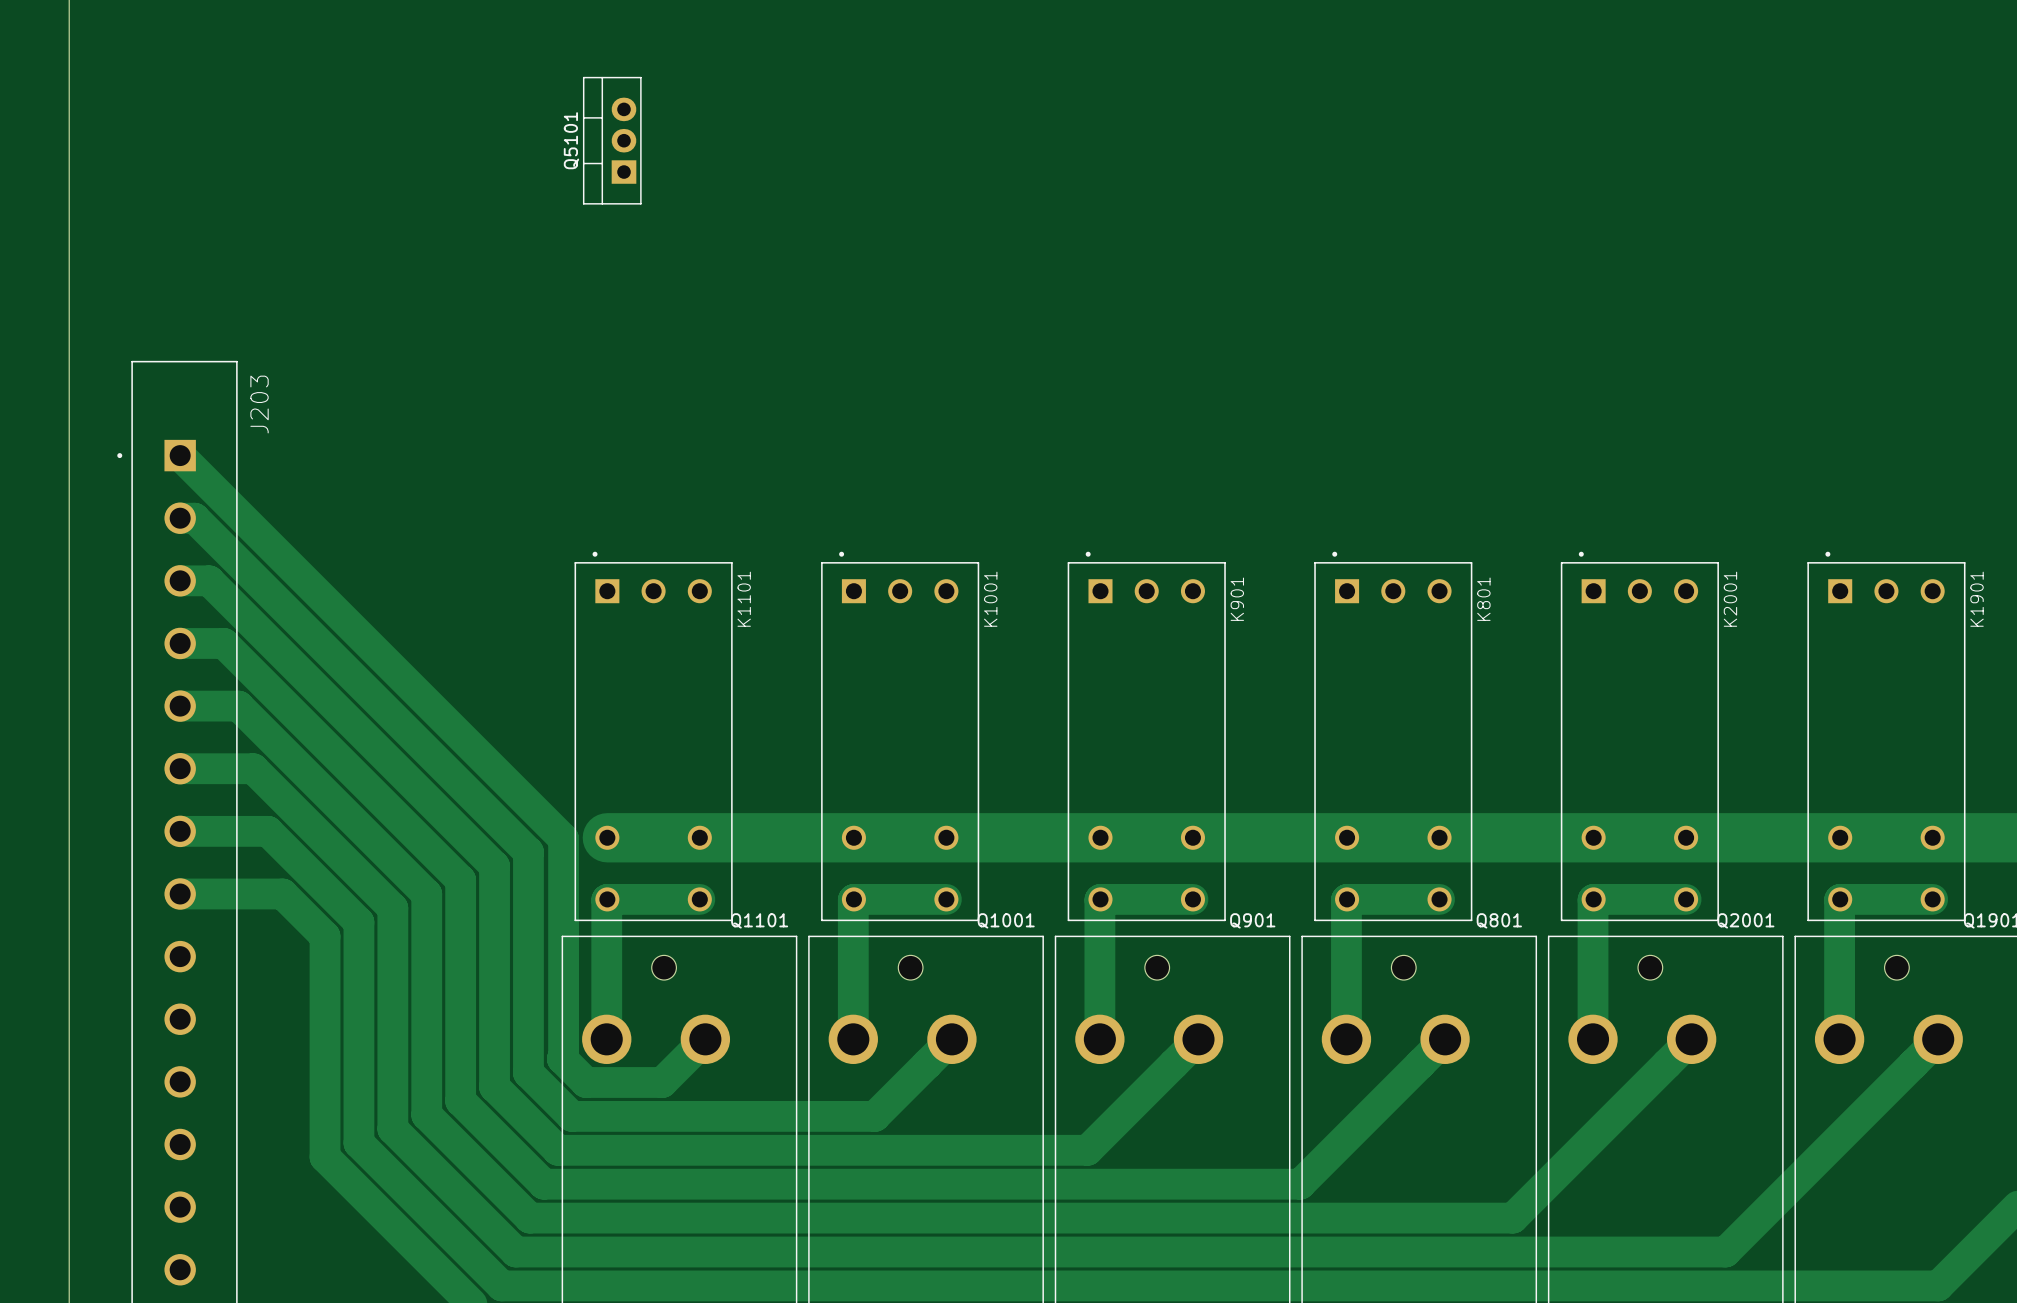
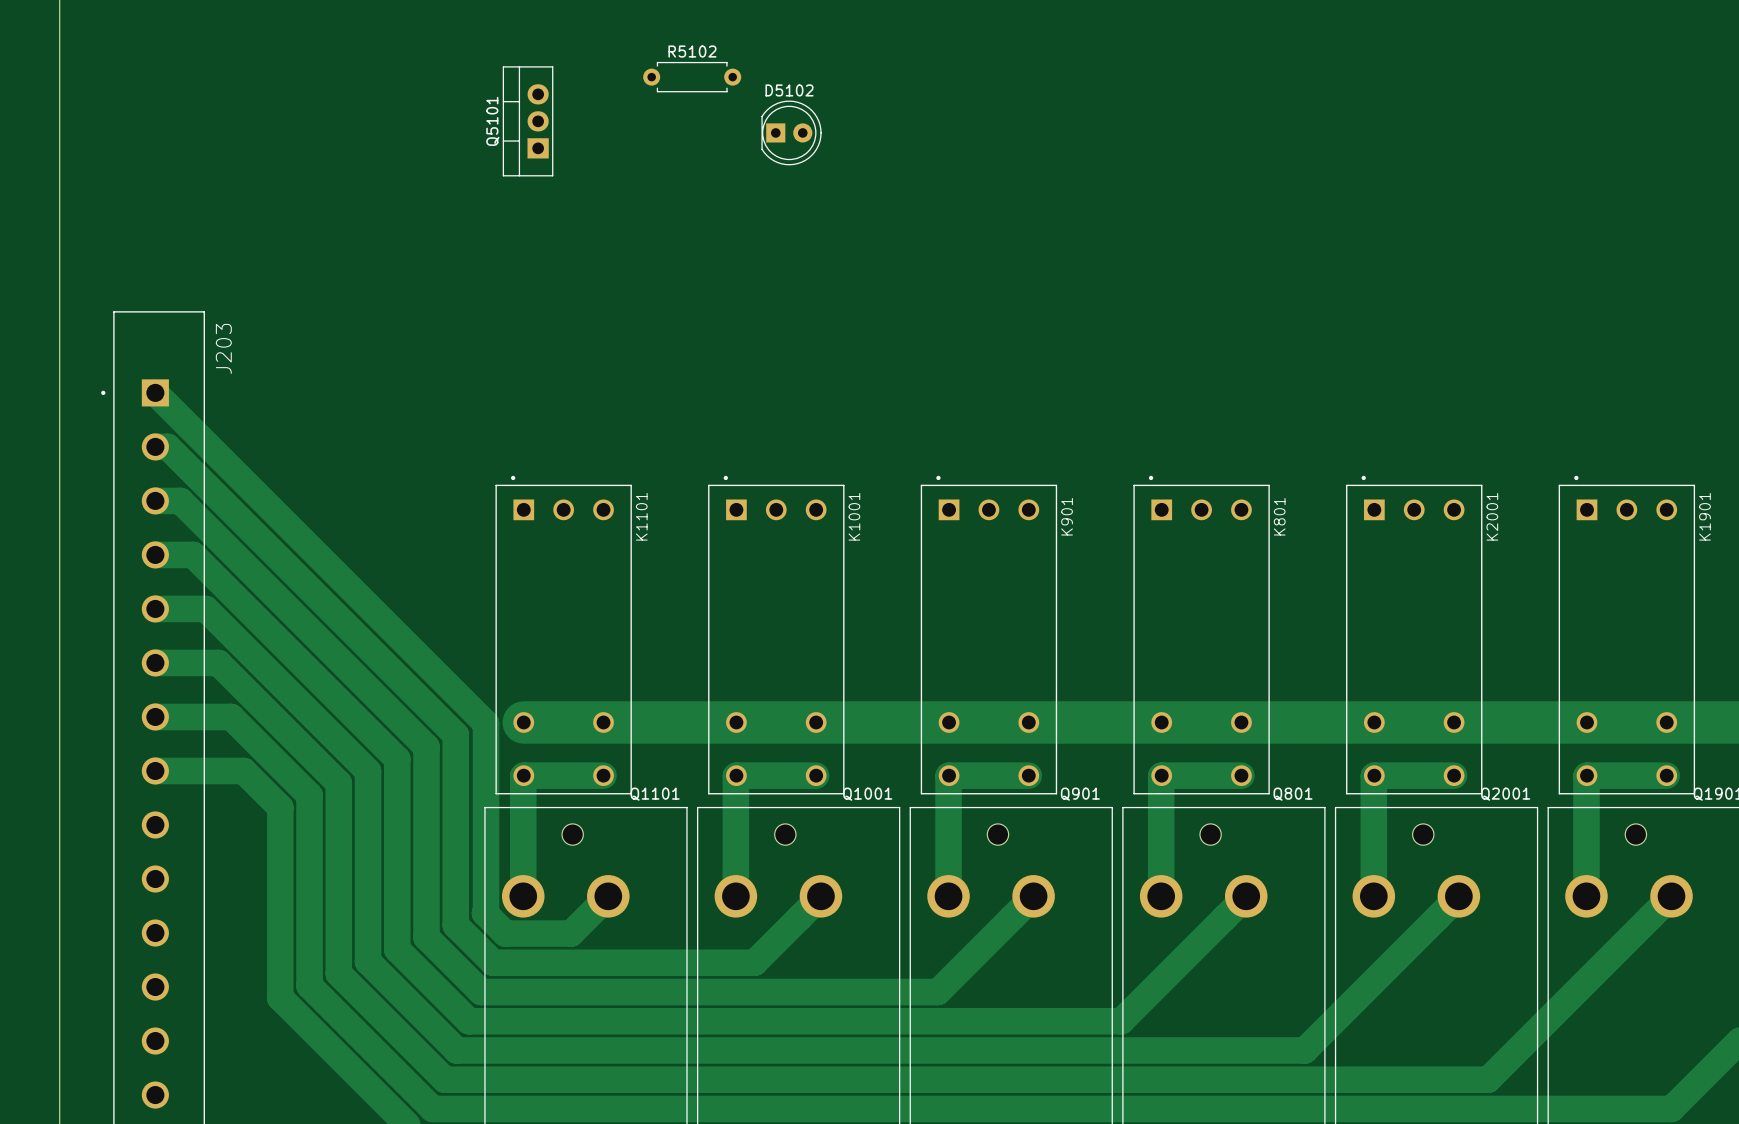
R5102: none -> (692, 77)
D5102: none -> (791, 132)

